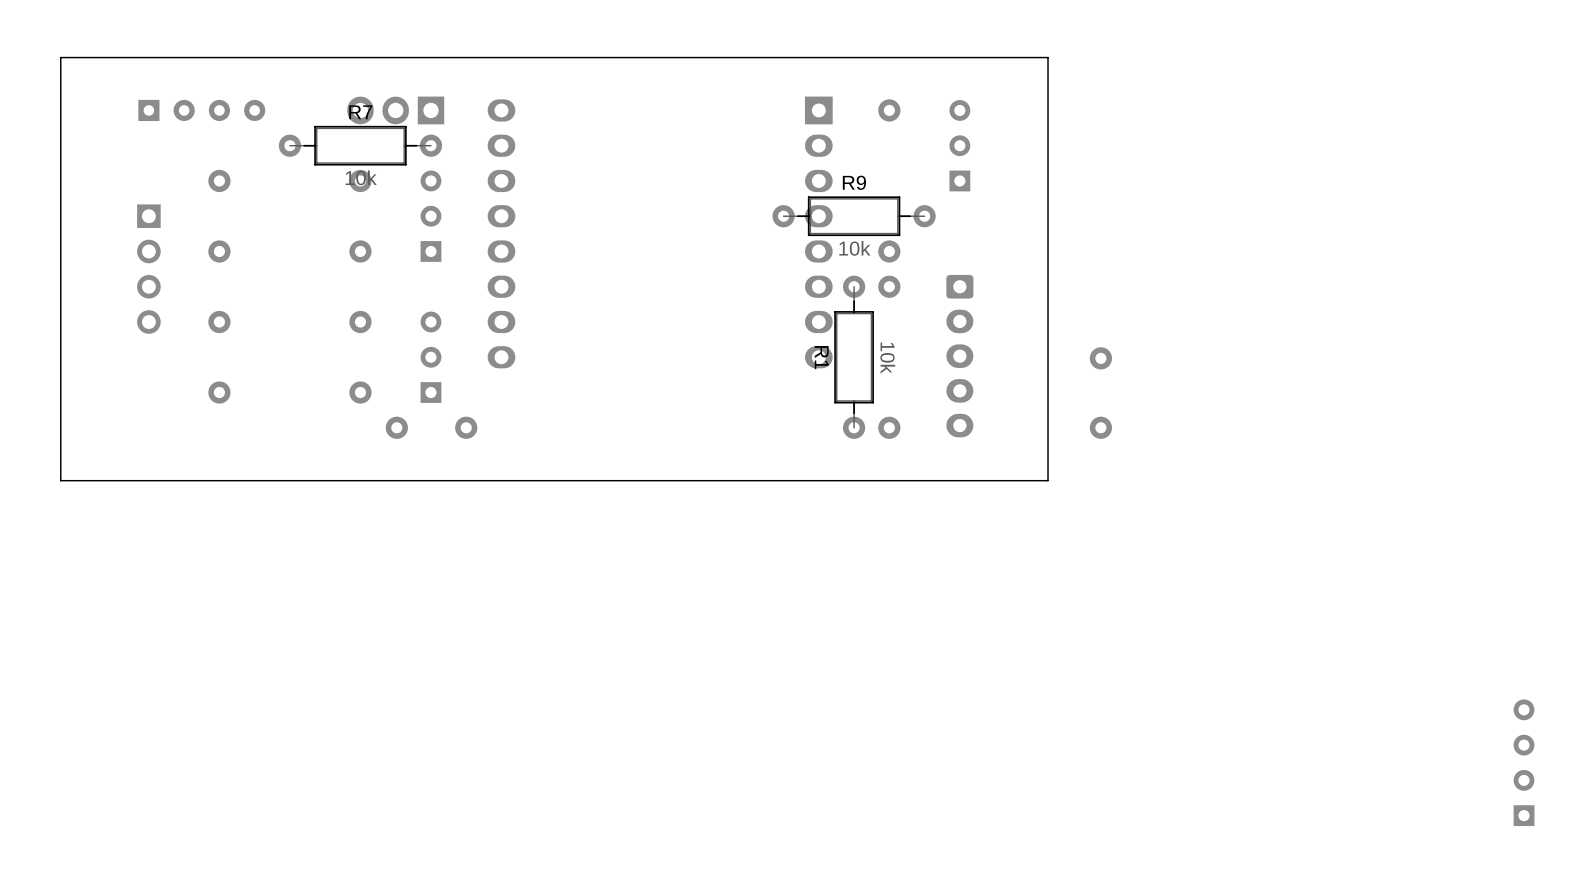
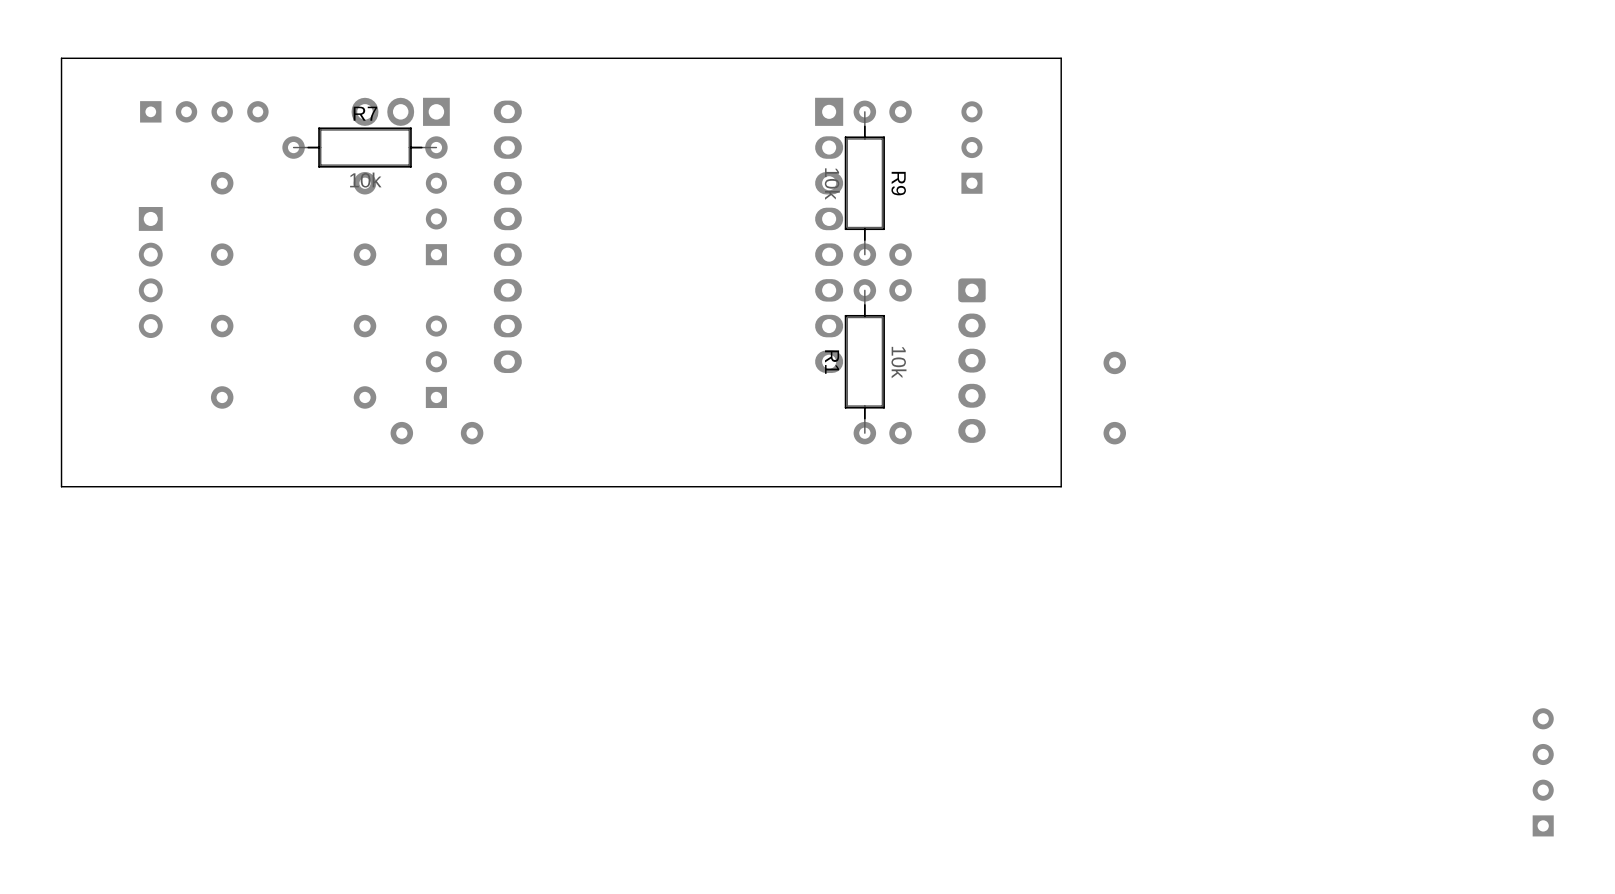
R9 rotation: 0° (854, 216) -> 90° clockwise (864, 183)

